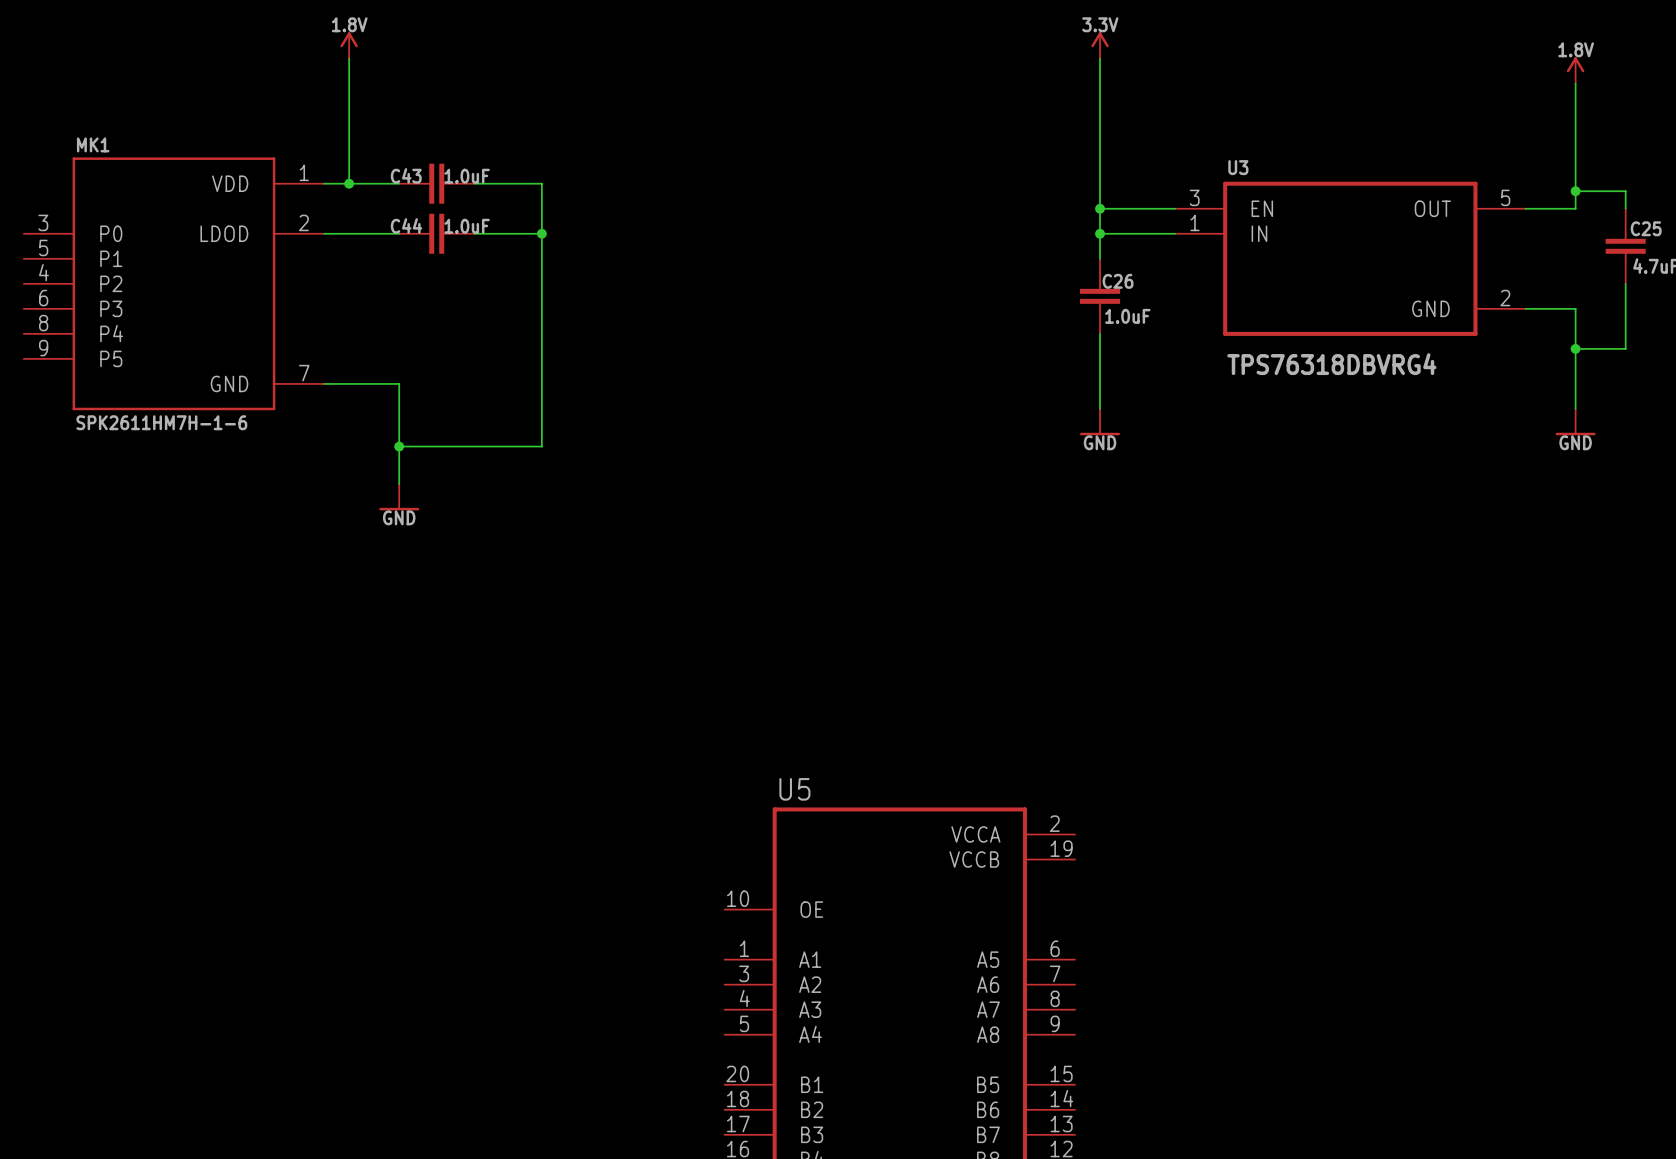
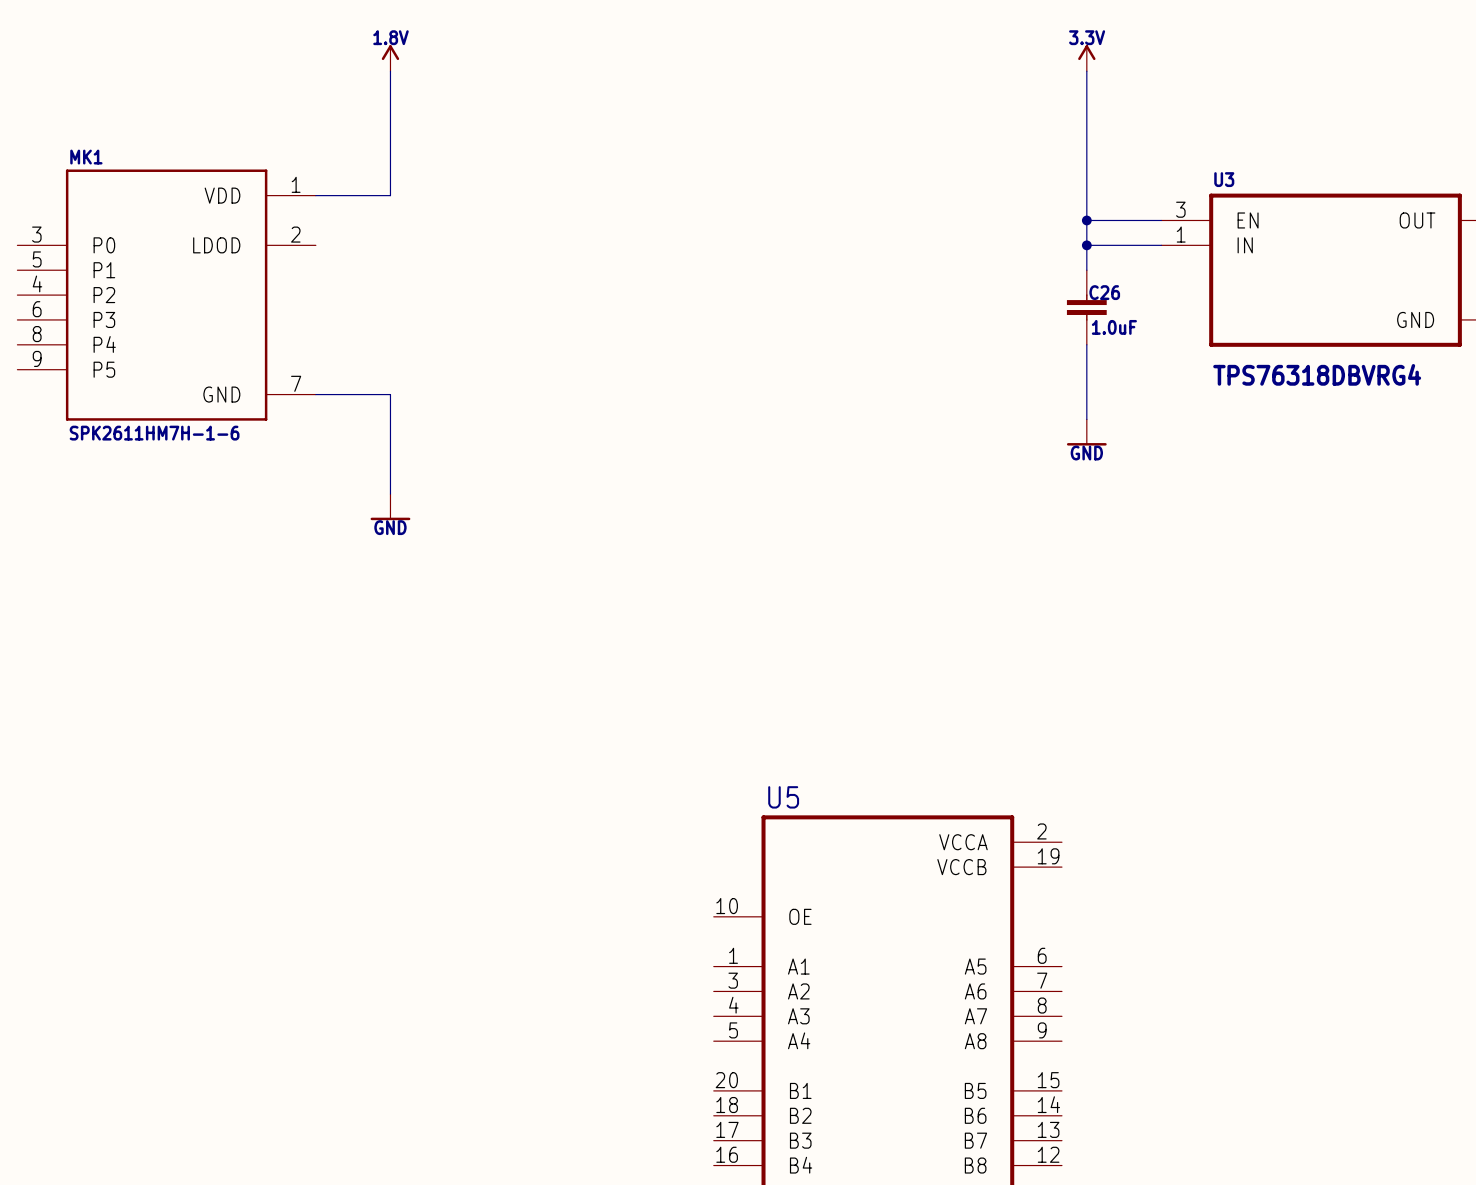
power symbol position: 1.8V (349, 45) -> 1.8V (390, 58)
wire: (349, 58) (349, 183) -> (390, 71) (390, 195)
junction: (349, 183) -> none
C43: 1.0uF (436, 183) -> none
wire: (474, 183) (541, 183) (541, 446) (399, 446) -> none
wire: (324, 233) (399, 233) -> none
C44: 1.0uF (436, 233) -> none
wire: (474, 233) (541, 233) -> none
junction: (541, 233) -> none
junction: (399, 446) -> none

